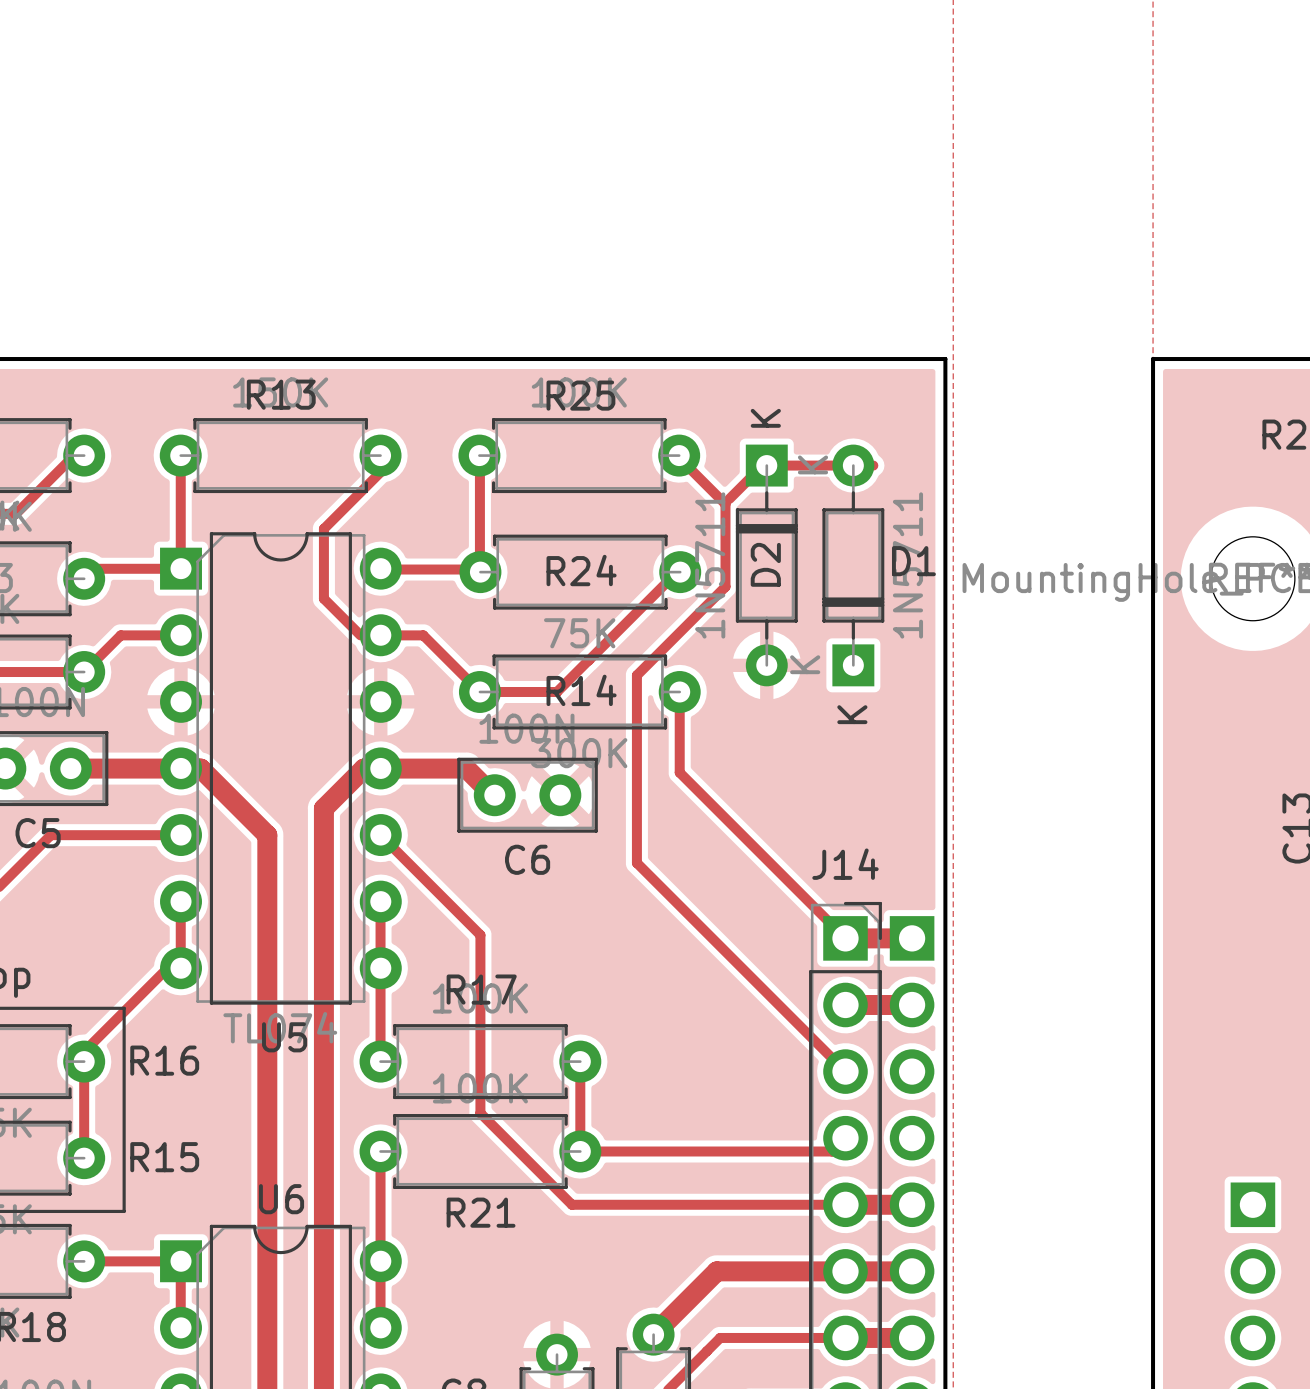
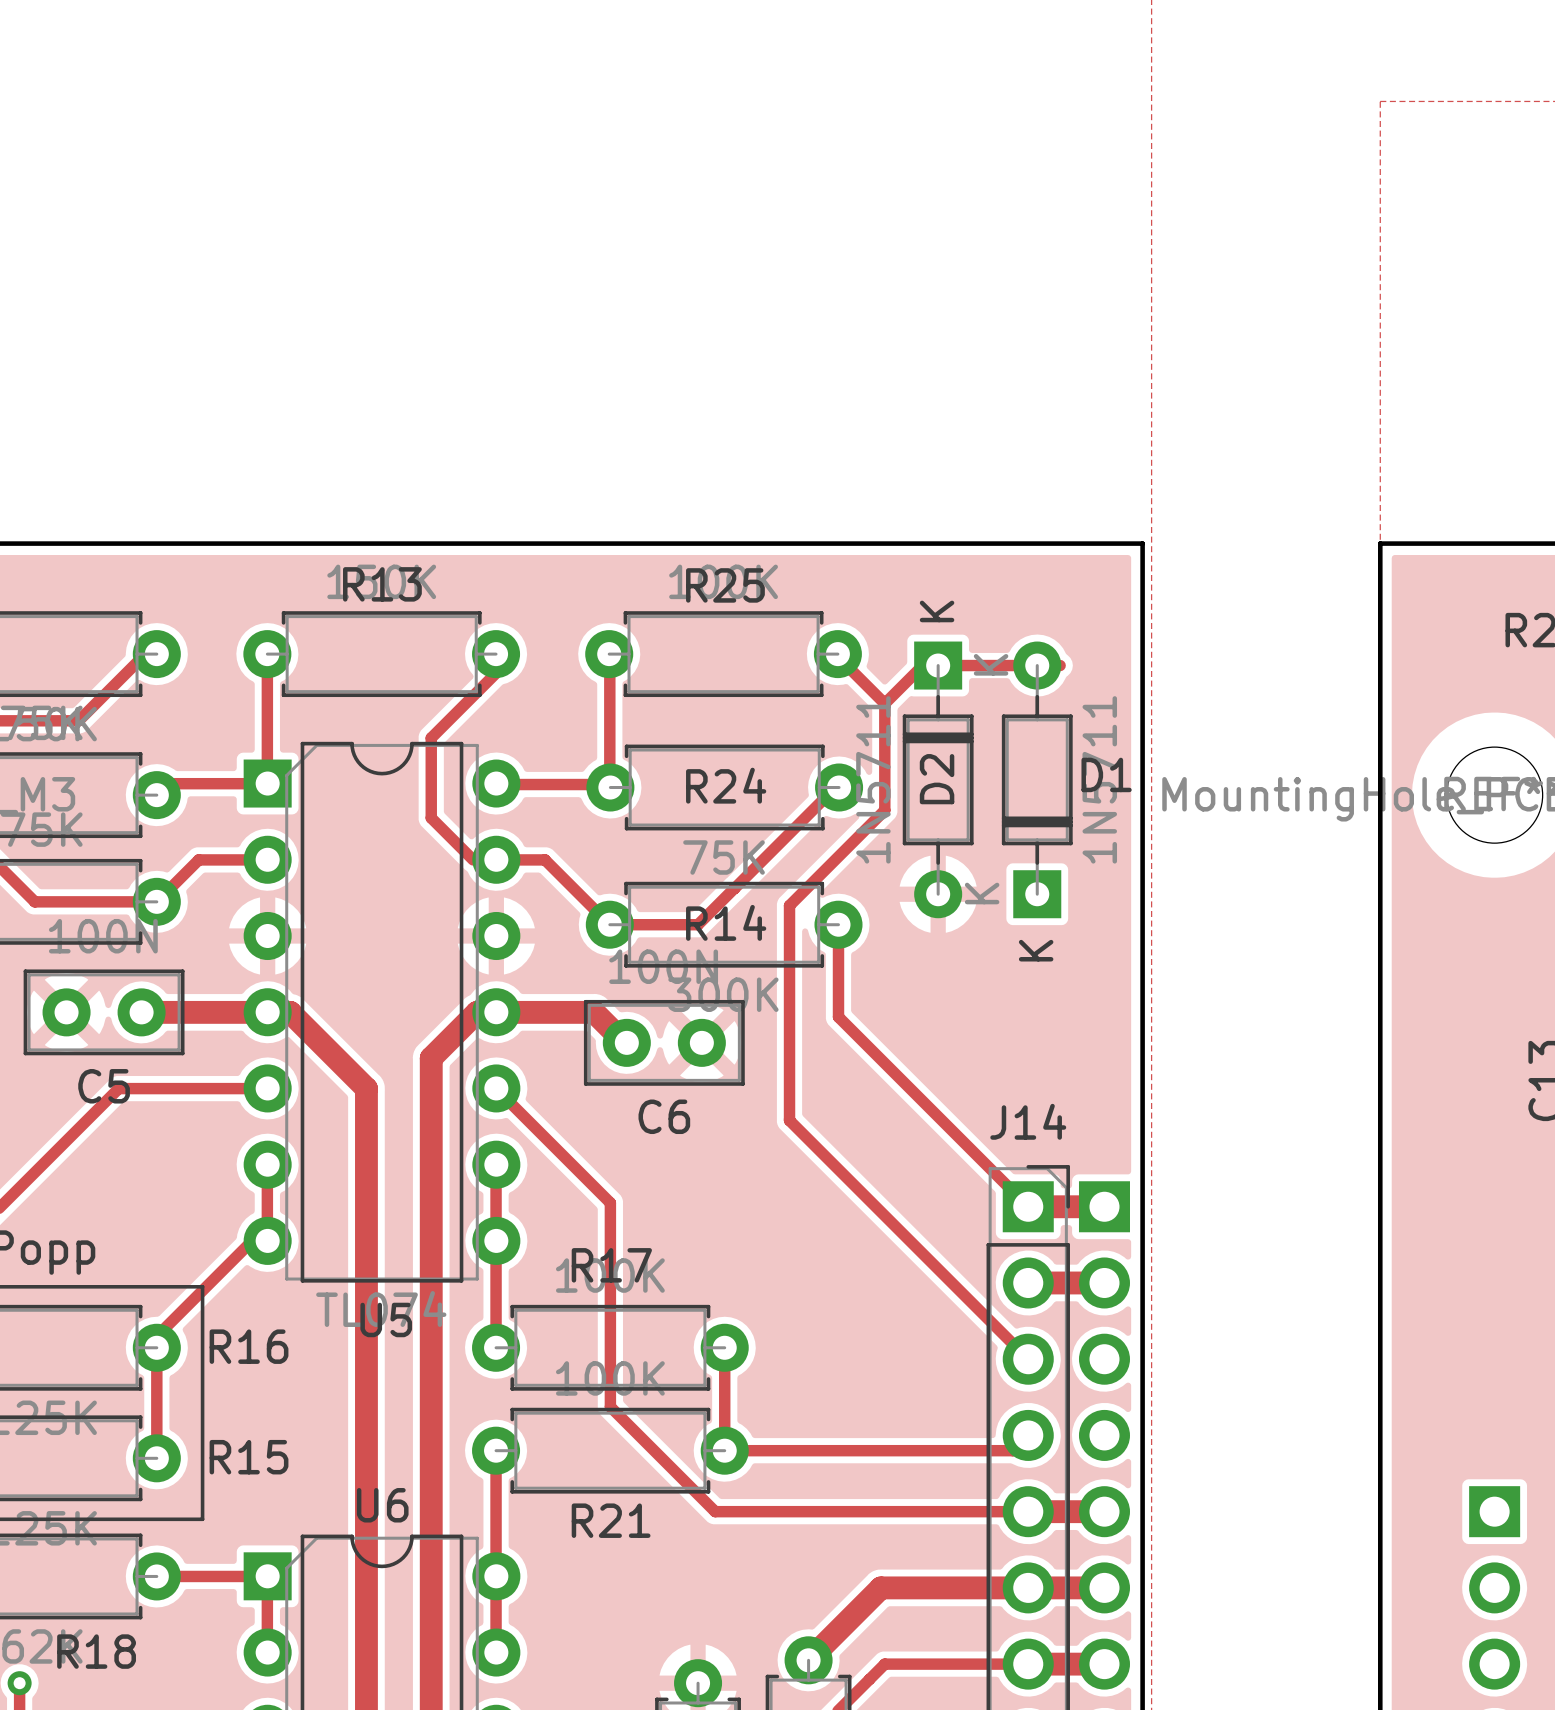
track: (753, 465) (753, 474) (729, 498) -> none
track: (720, 498) (725, 504) (725, 586) (720, 592) -> (922, 665) (884, 703) (884, 810)

